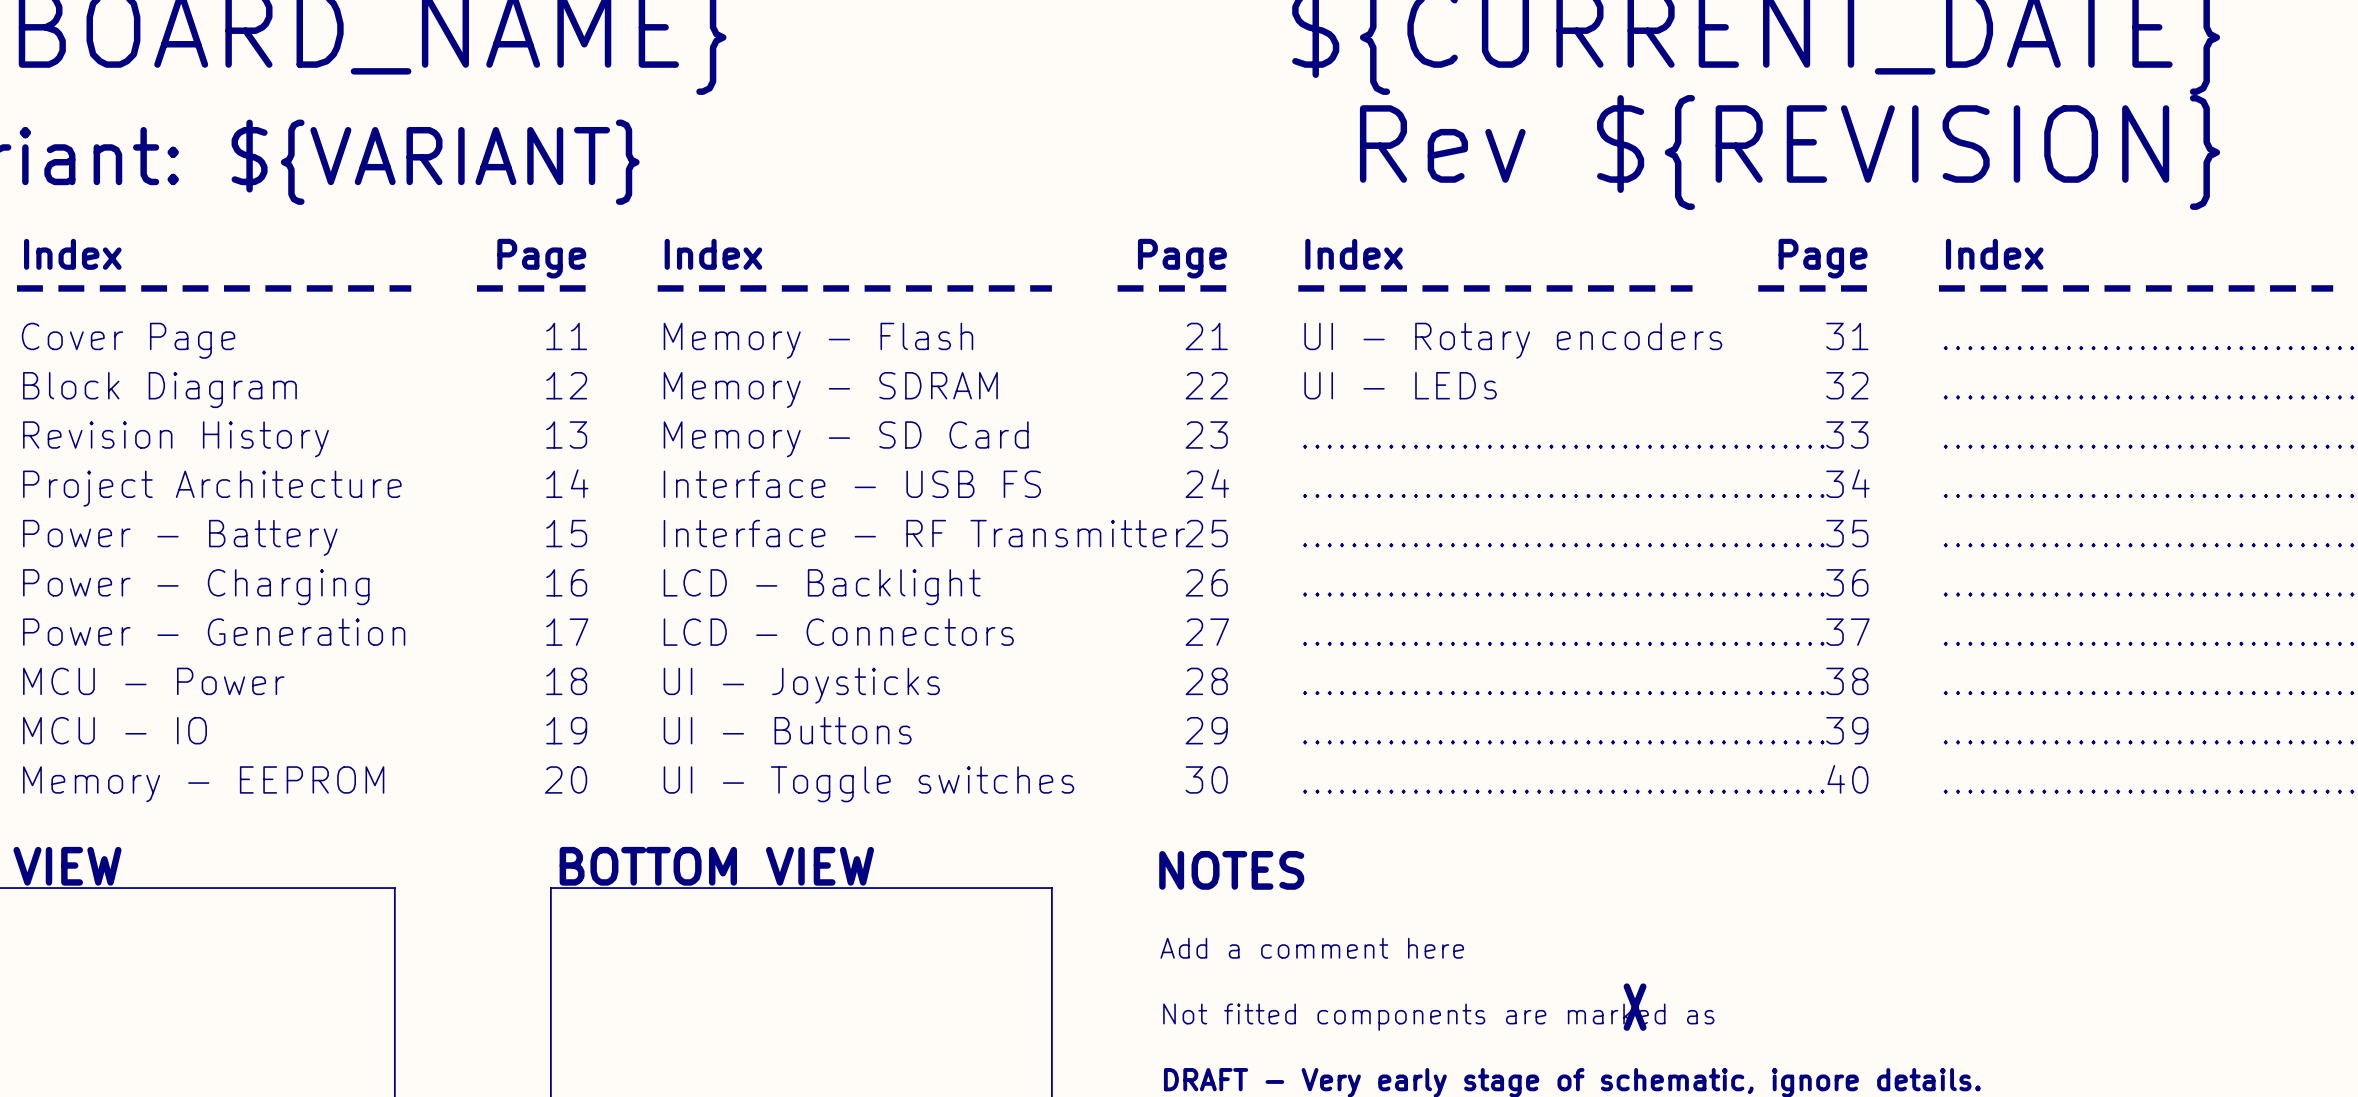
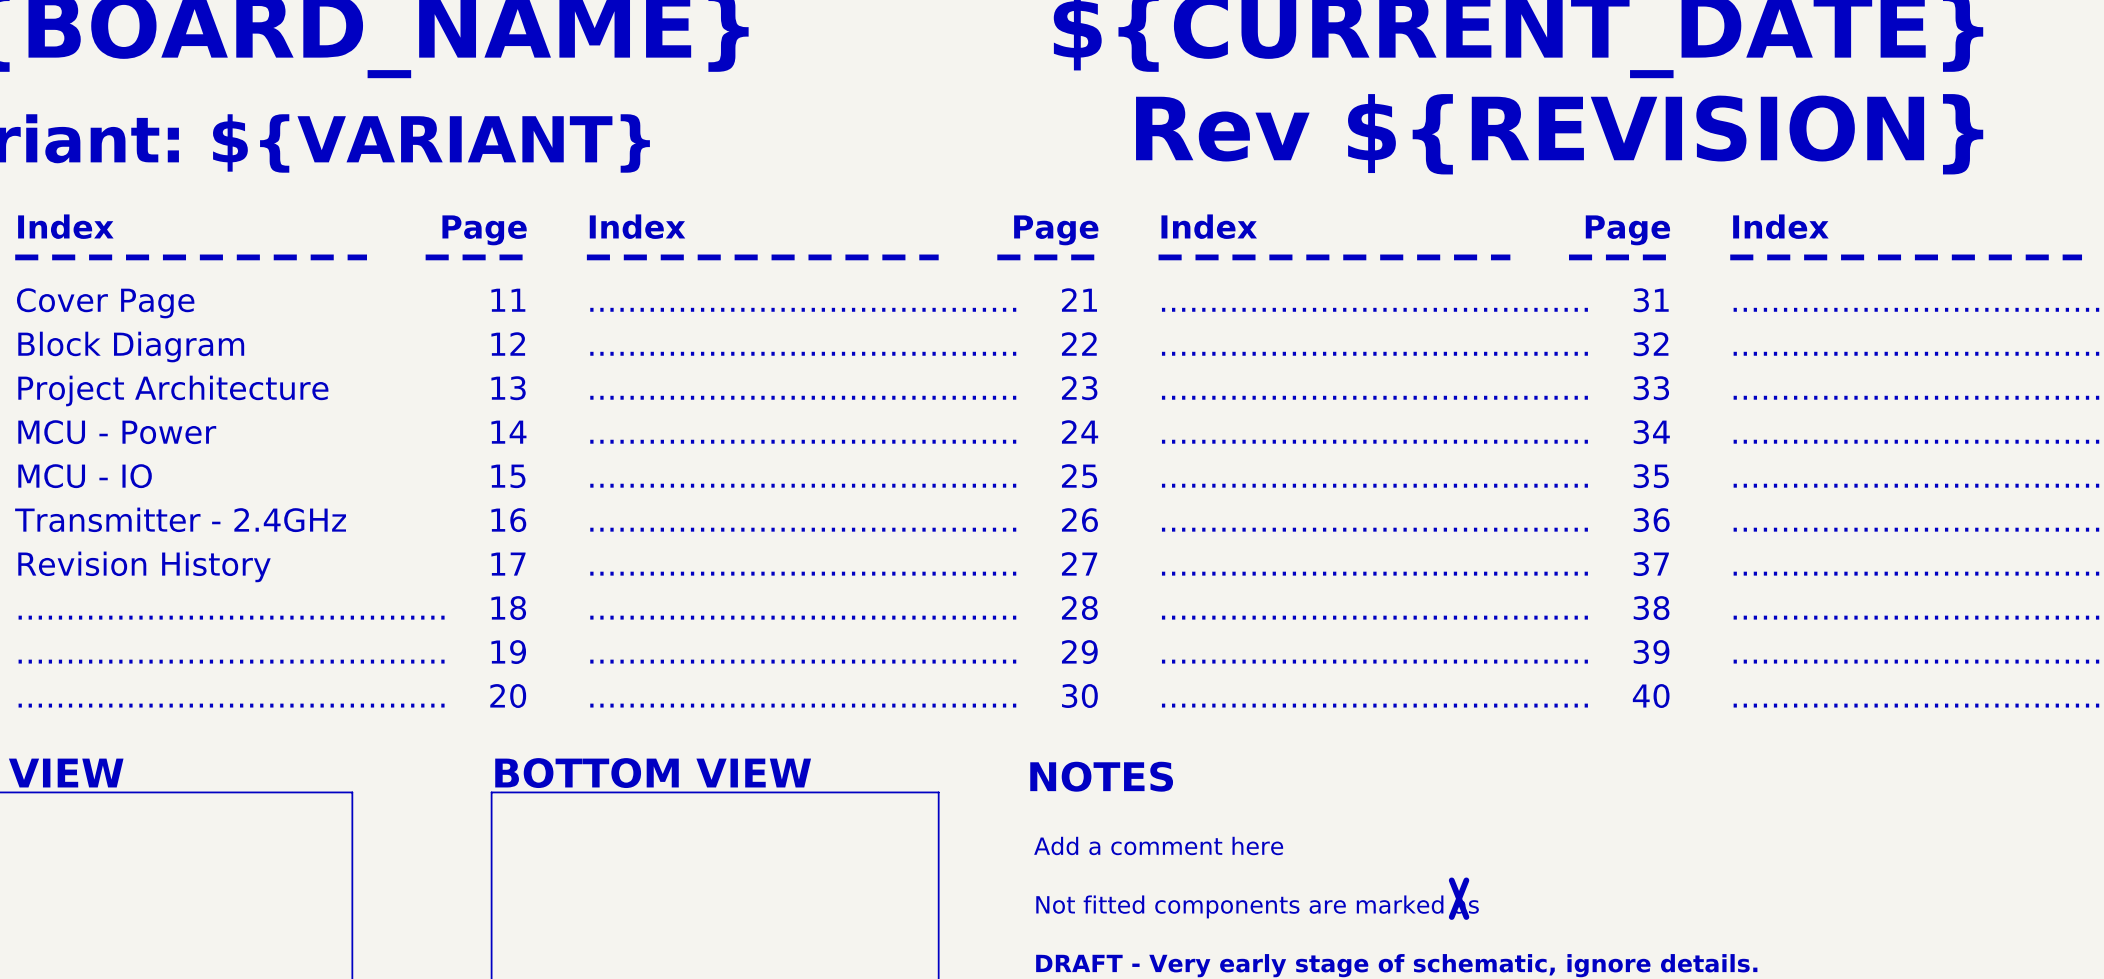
text: Memory - Flash (818, 340) -> ........................................... (803, 309)
text: UI - Rotary encoders (1513, 340) -> ........................................... (1374, 309)
text: UI - LEDs (1400, 385) -> ........................................... (1374, 353)
text: Memory - SDRAM (830, 390) -> ........................................... (803, 353)
text: Revision History (175, 439) -> Project Architecture (173, 390)
text: Memory - SD Card (846, 439) -> ........................................... (803, 397)
text: Interface - USB FS (852, 484) -> ........................................... (803, 441)
text: Project Architecture (212, 488) -> MCU - Power (117, 432)
text: Interface - RF Transmitter (924, 533) -> ........................................... (803, 485)
text: Power - Battery (180, 537) -> MCU - IO (85, 476)
text: Power - Charging (196, 587) -> Transmitter - 2.4GHz (180, 519)
text: LCD - Backlight (822, 587) -> ........................................... (803, 529)
text: Power - Generation (214, 632) -> Revision History (144, 566)
text: LCD - Connectors (838, 632) -> ........................................... (803, 573)
text: MCU - Power (153, 681) -> ........................................... (231, 617)
text: UI - Joysticks (801, 685) -> ........................................... (803, 617)
text: MCU - IO (115, 730) -> ........................................... (231, 661)
text: UI - Buttons (787, 730) -> ........................................... (803, 661)
text: Memory - EEPROM (203, 784) -> ........................................... (231, 705)
text: UI - Toggle switches (868, 784) -> ........................................... (803, 705)

